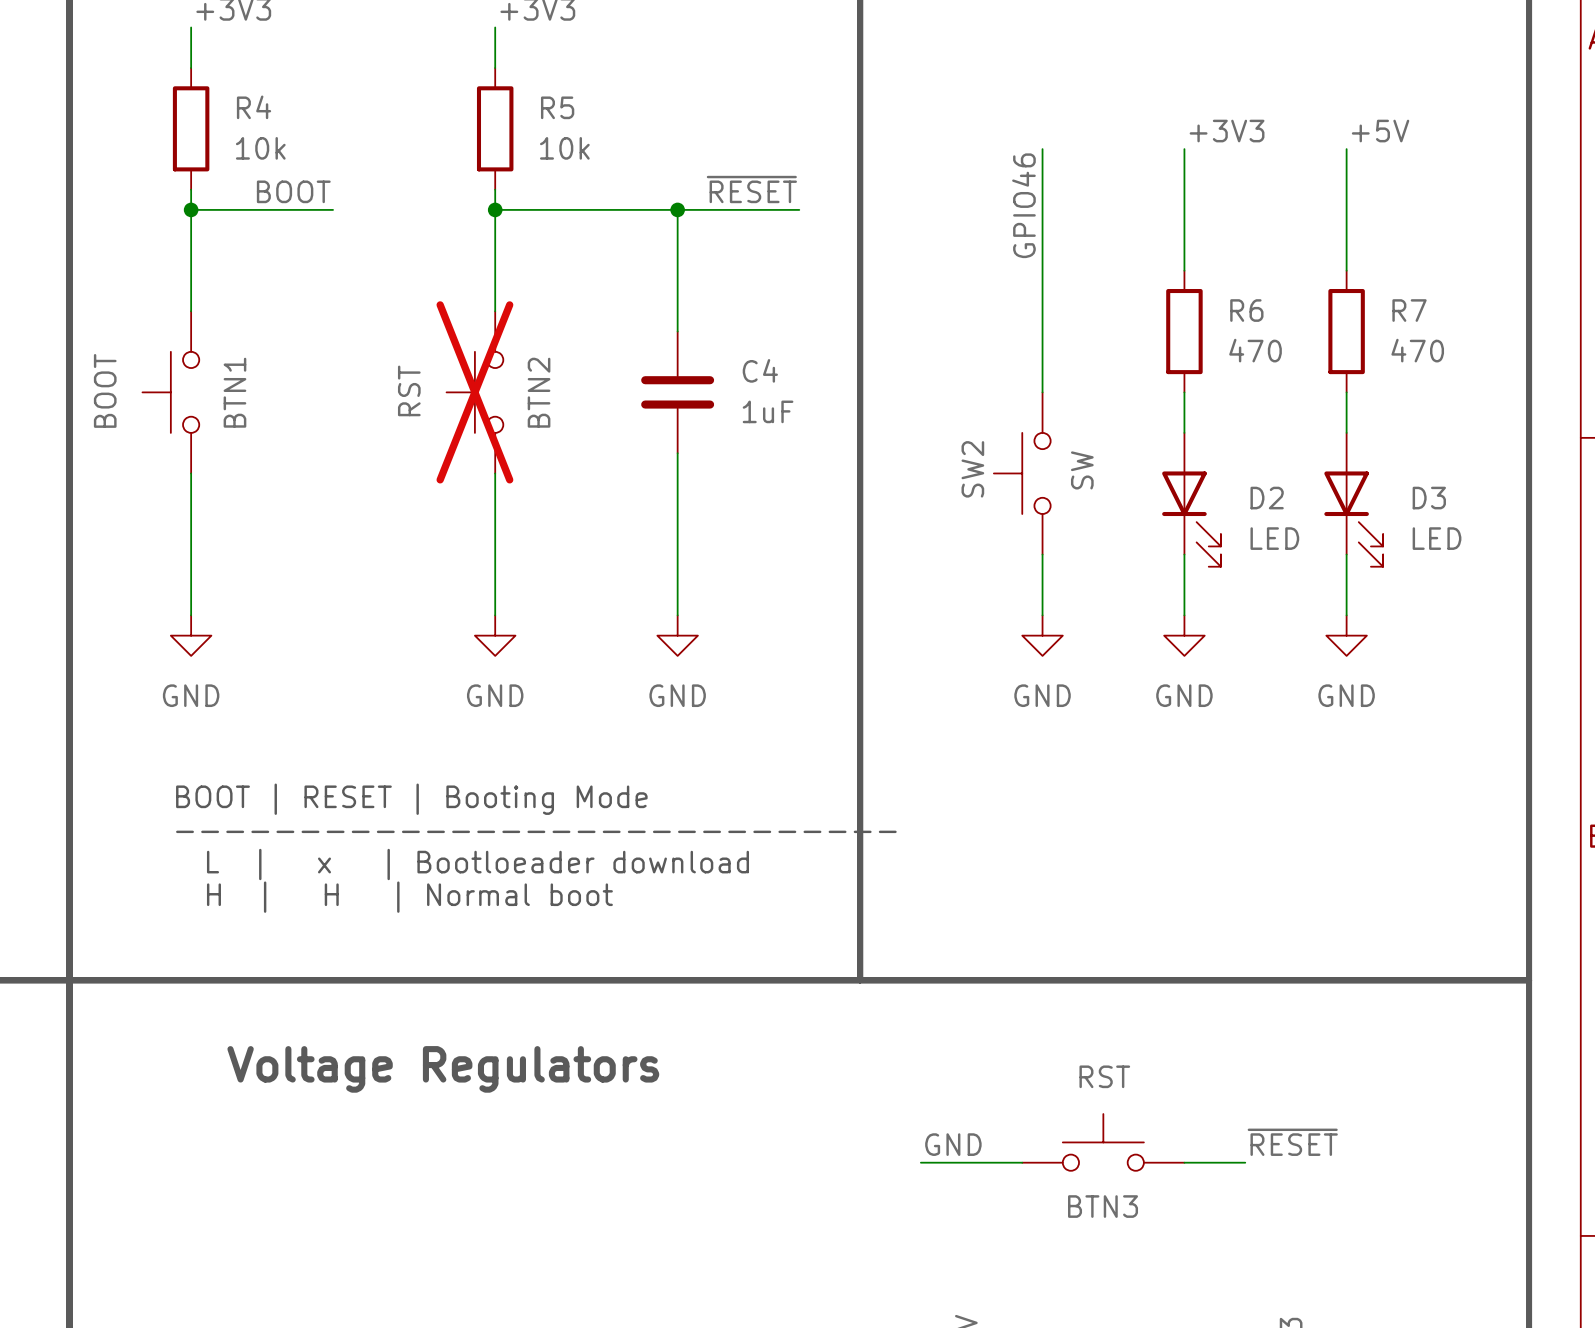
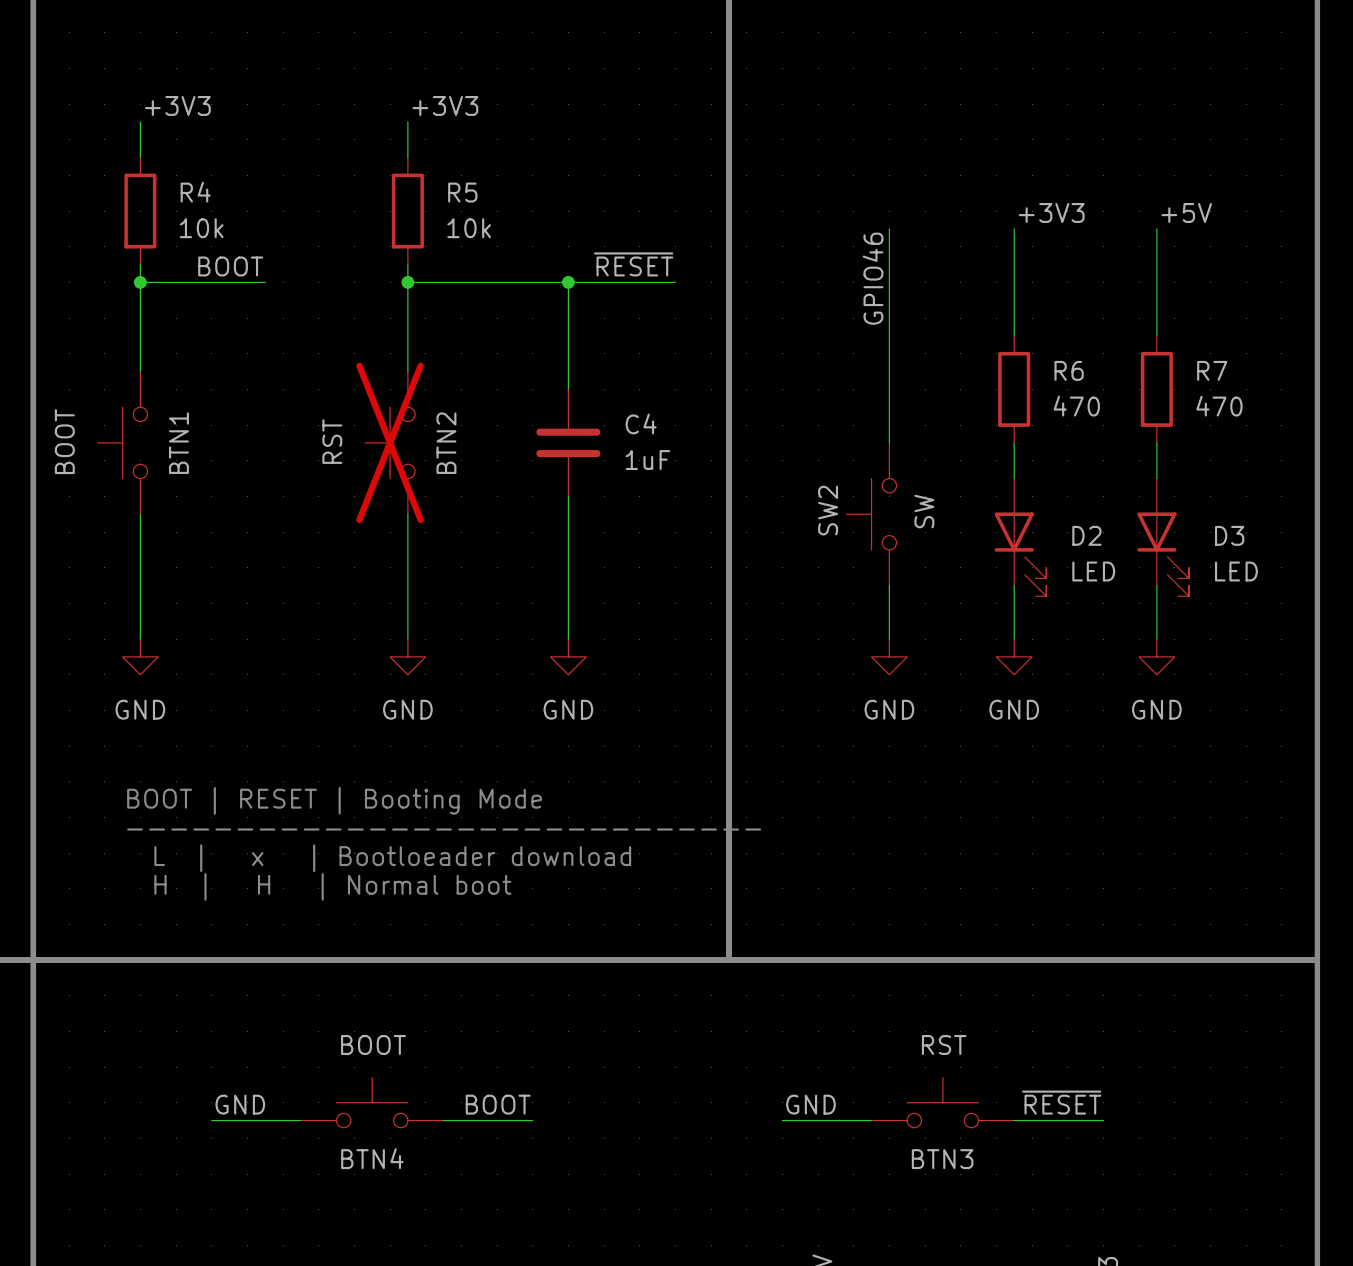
text: Voltage Regulators (443, 1069) -> none
BTN4: none -> BOOT (372, 1102)
label position: ~{RESET} (1292, 1142) -> ~{RESET} (1061, 1102)
label: none -> GND (240, 1104)
label: none -> BOOT (498, 1104)
wire: none -> (211, 1120) (300, 1120)
wire: none -> (443, 1120) (532, 1120)
wire: none -> (1067, 1120) (1103, 1120)

